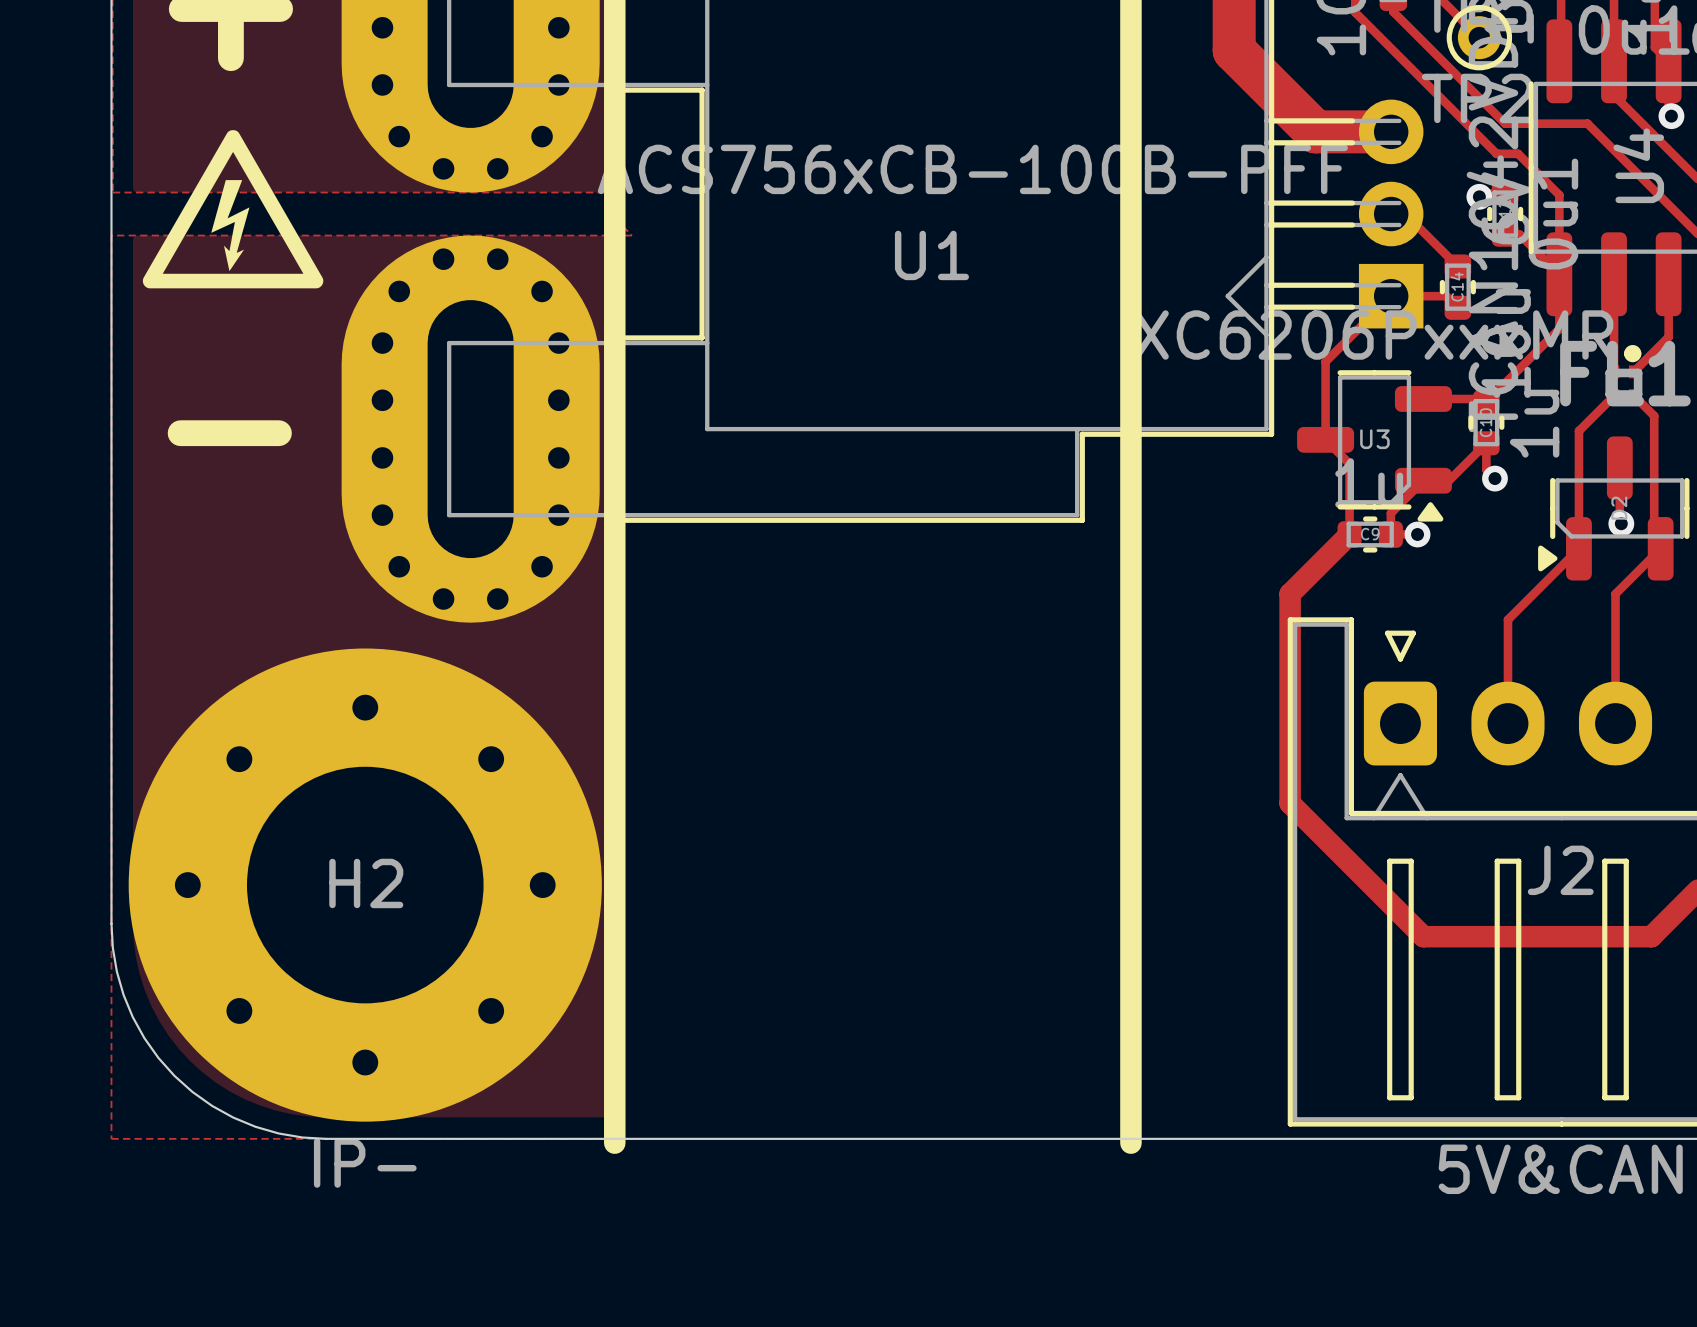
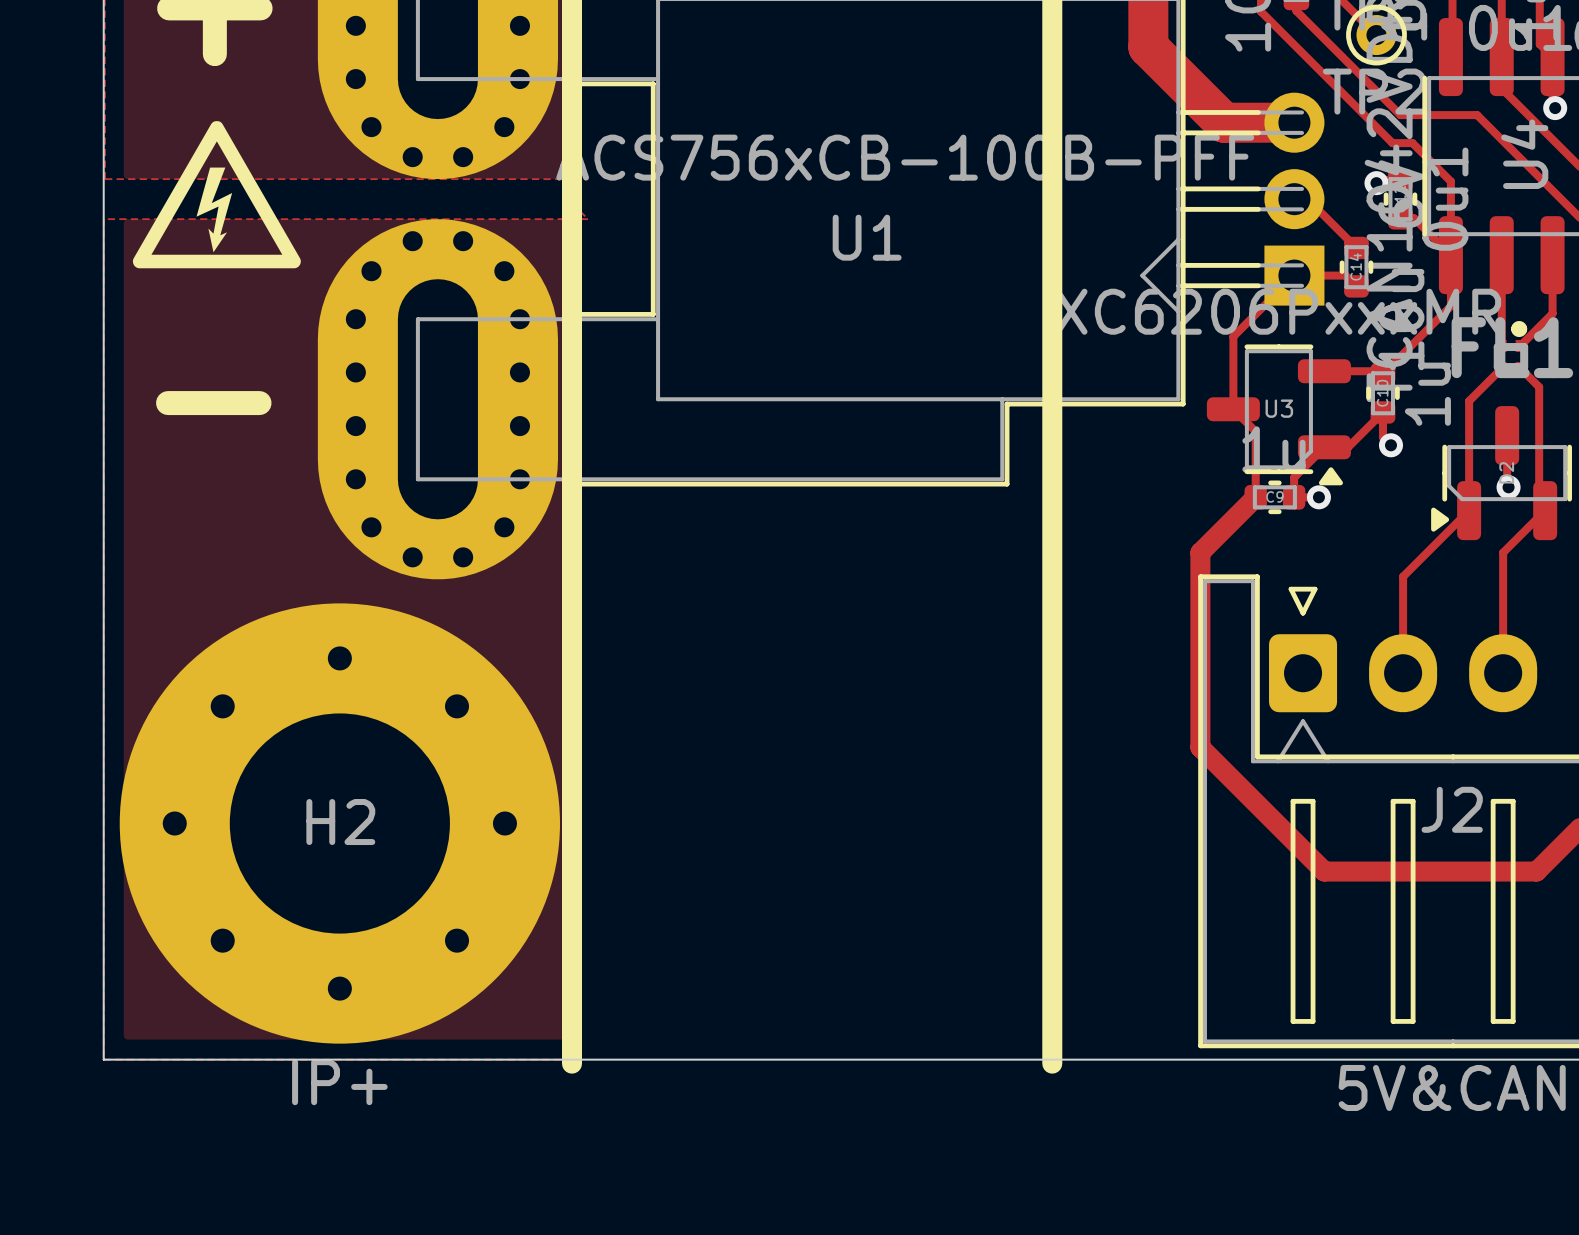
board edge: (111, 923) (112, 947) (123, 994) (144, 1038) (174, 1075) (212, 1105) (255, 1126) (278, 1133) (326, 1138) -> (103, 859) (103, 1059) (303, 1059)
H2 value: IP- (365, 1163) -> IP+ (339, 1082)

